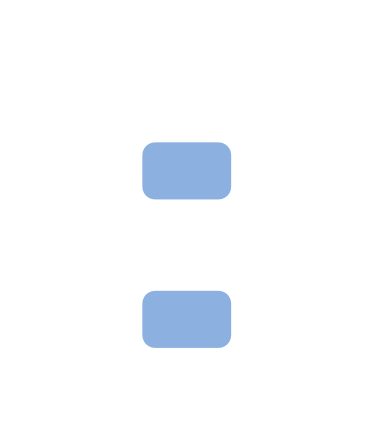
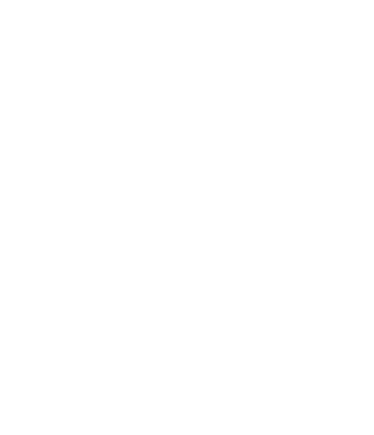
part: (186, 245) -> none

